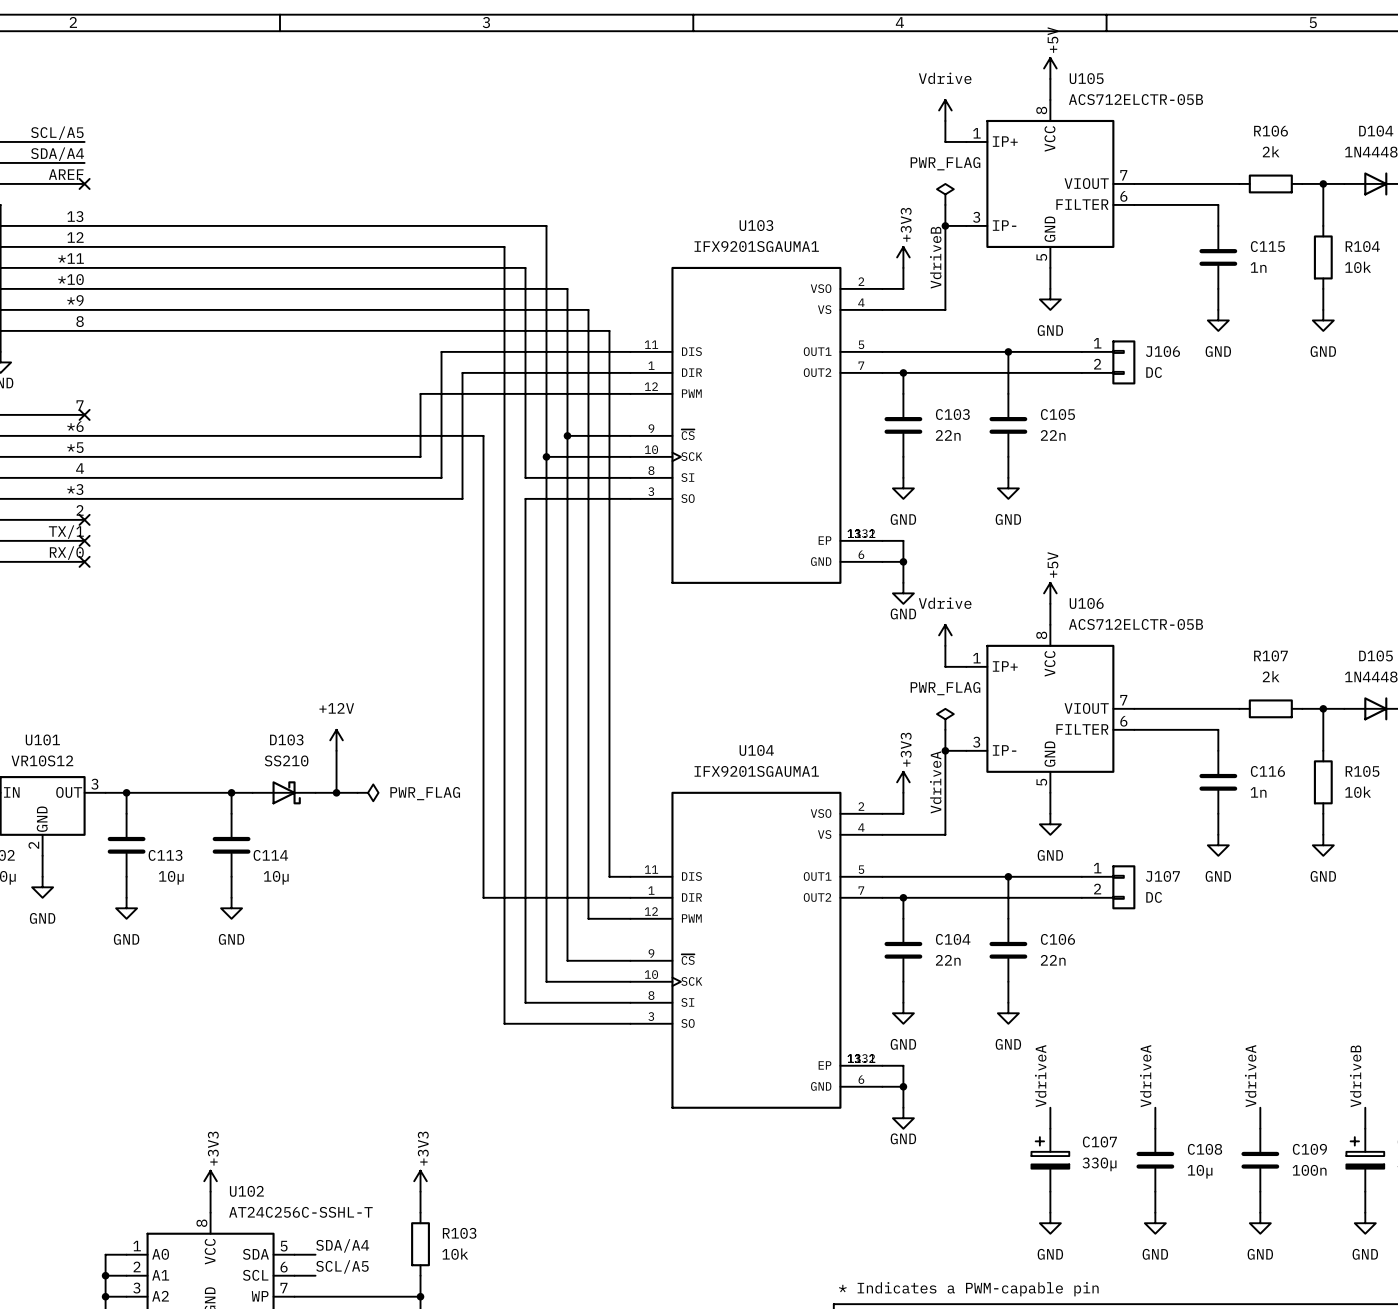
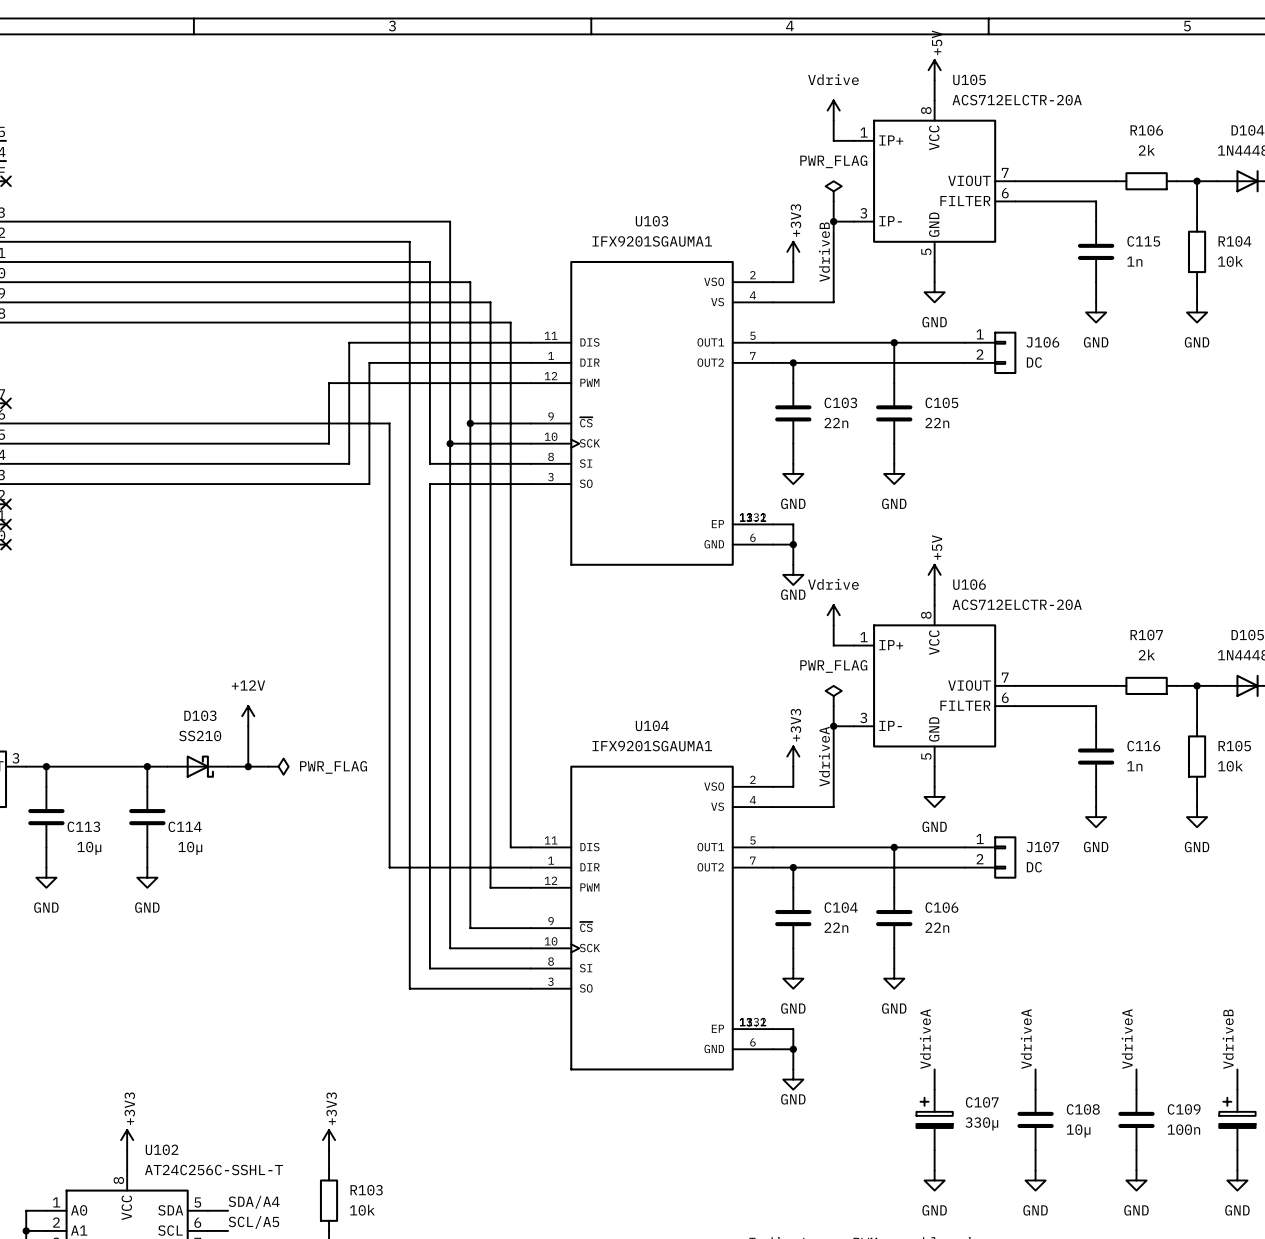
U105 value: ACS712ELCTR-05B (1135, 99) -> ACS712ELCTR-20A (1017, 100)
U106 value: ACS712ELCTR-05B (1135, 624) -> ACS712ELCTR-20A (1017, 604)

